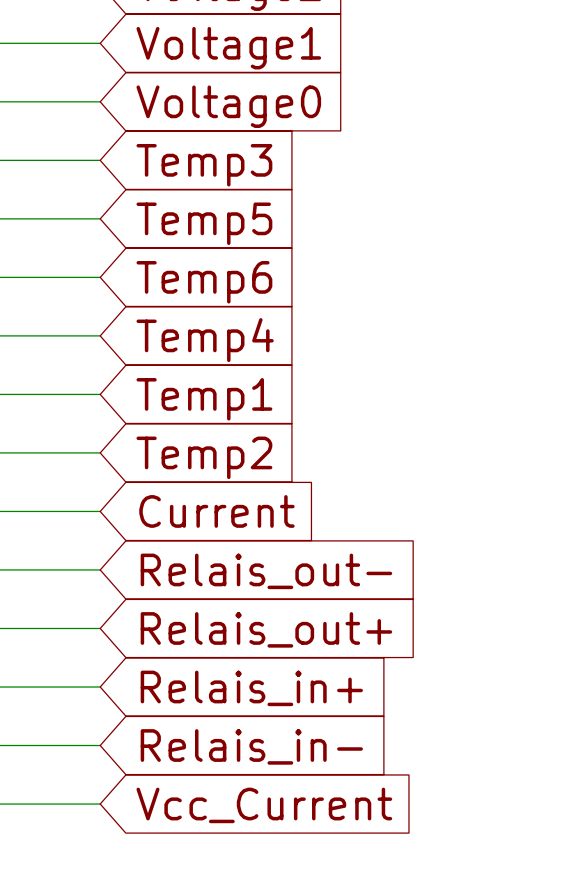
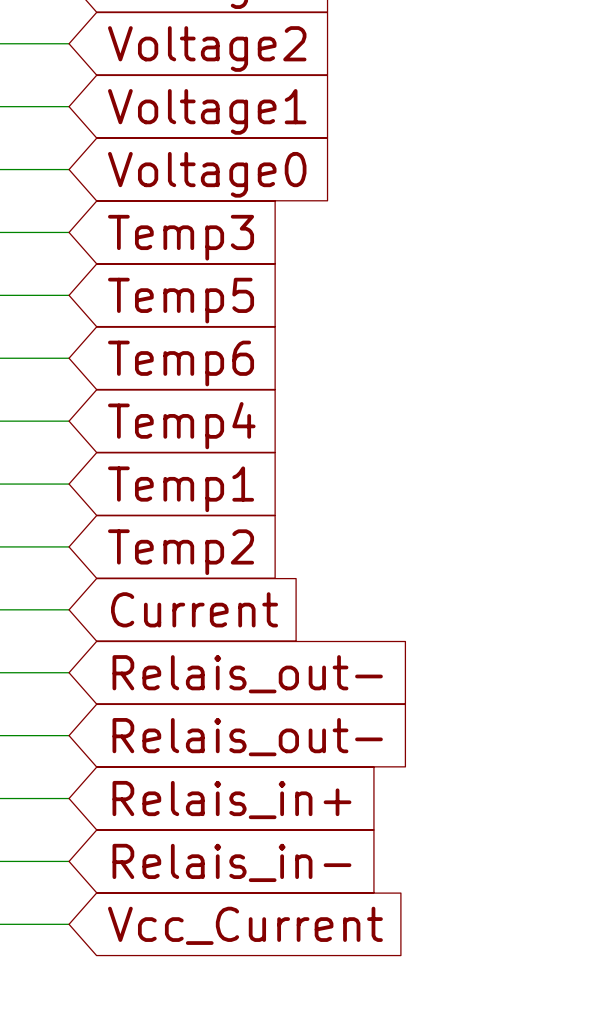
global label: Relais_out+ (266, 629) -> Relais_out- (247, 737)

